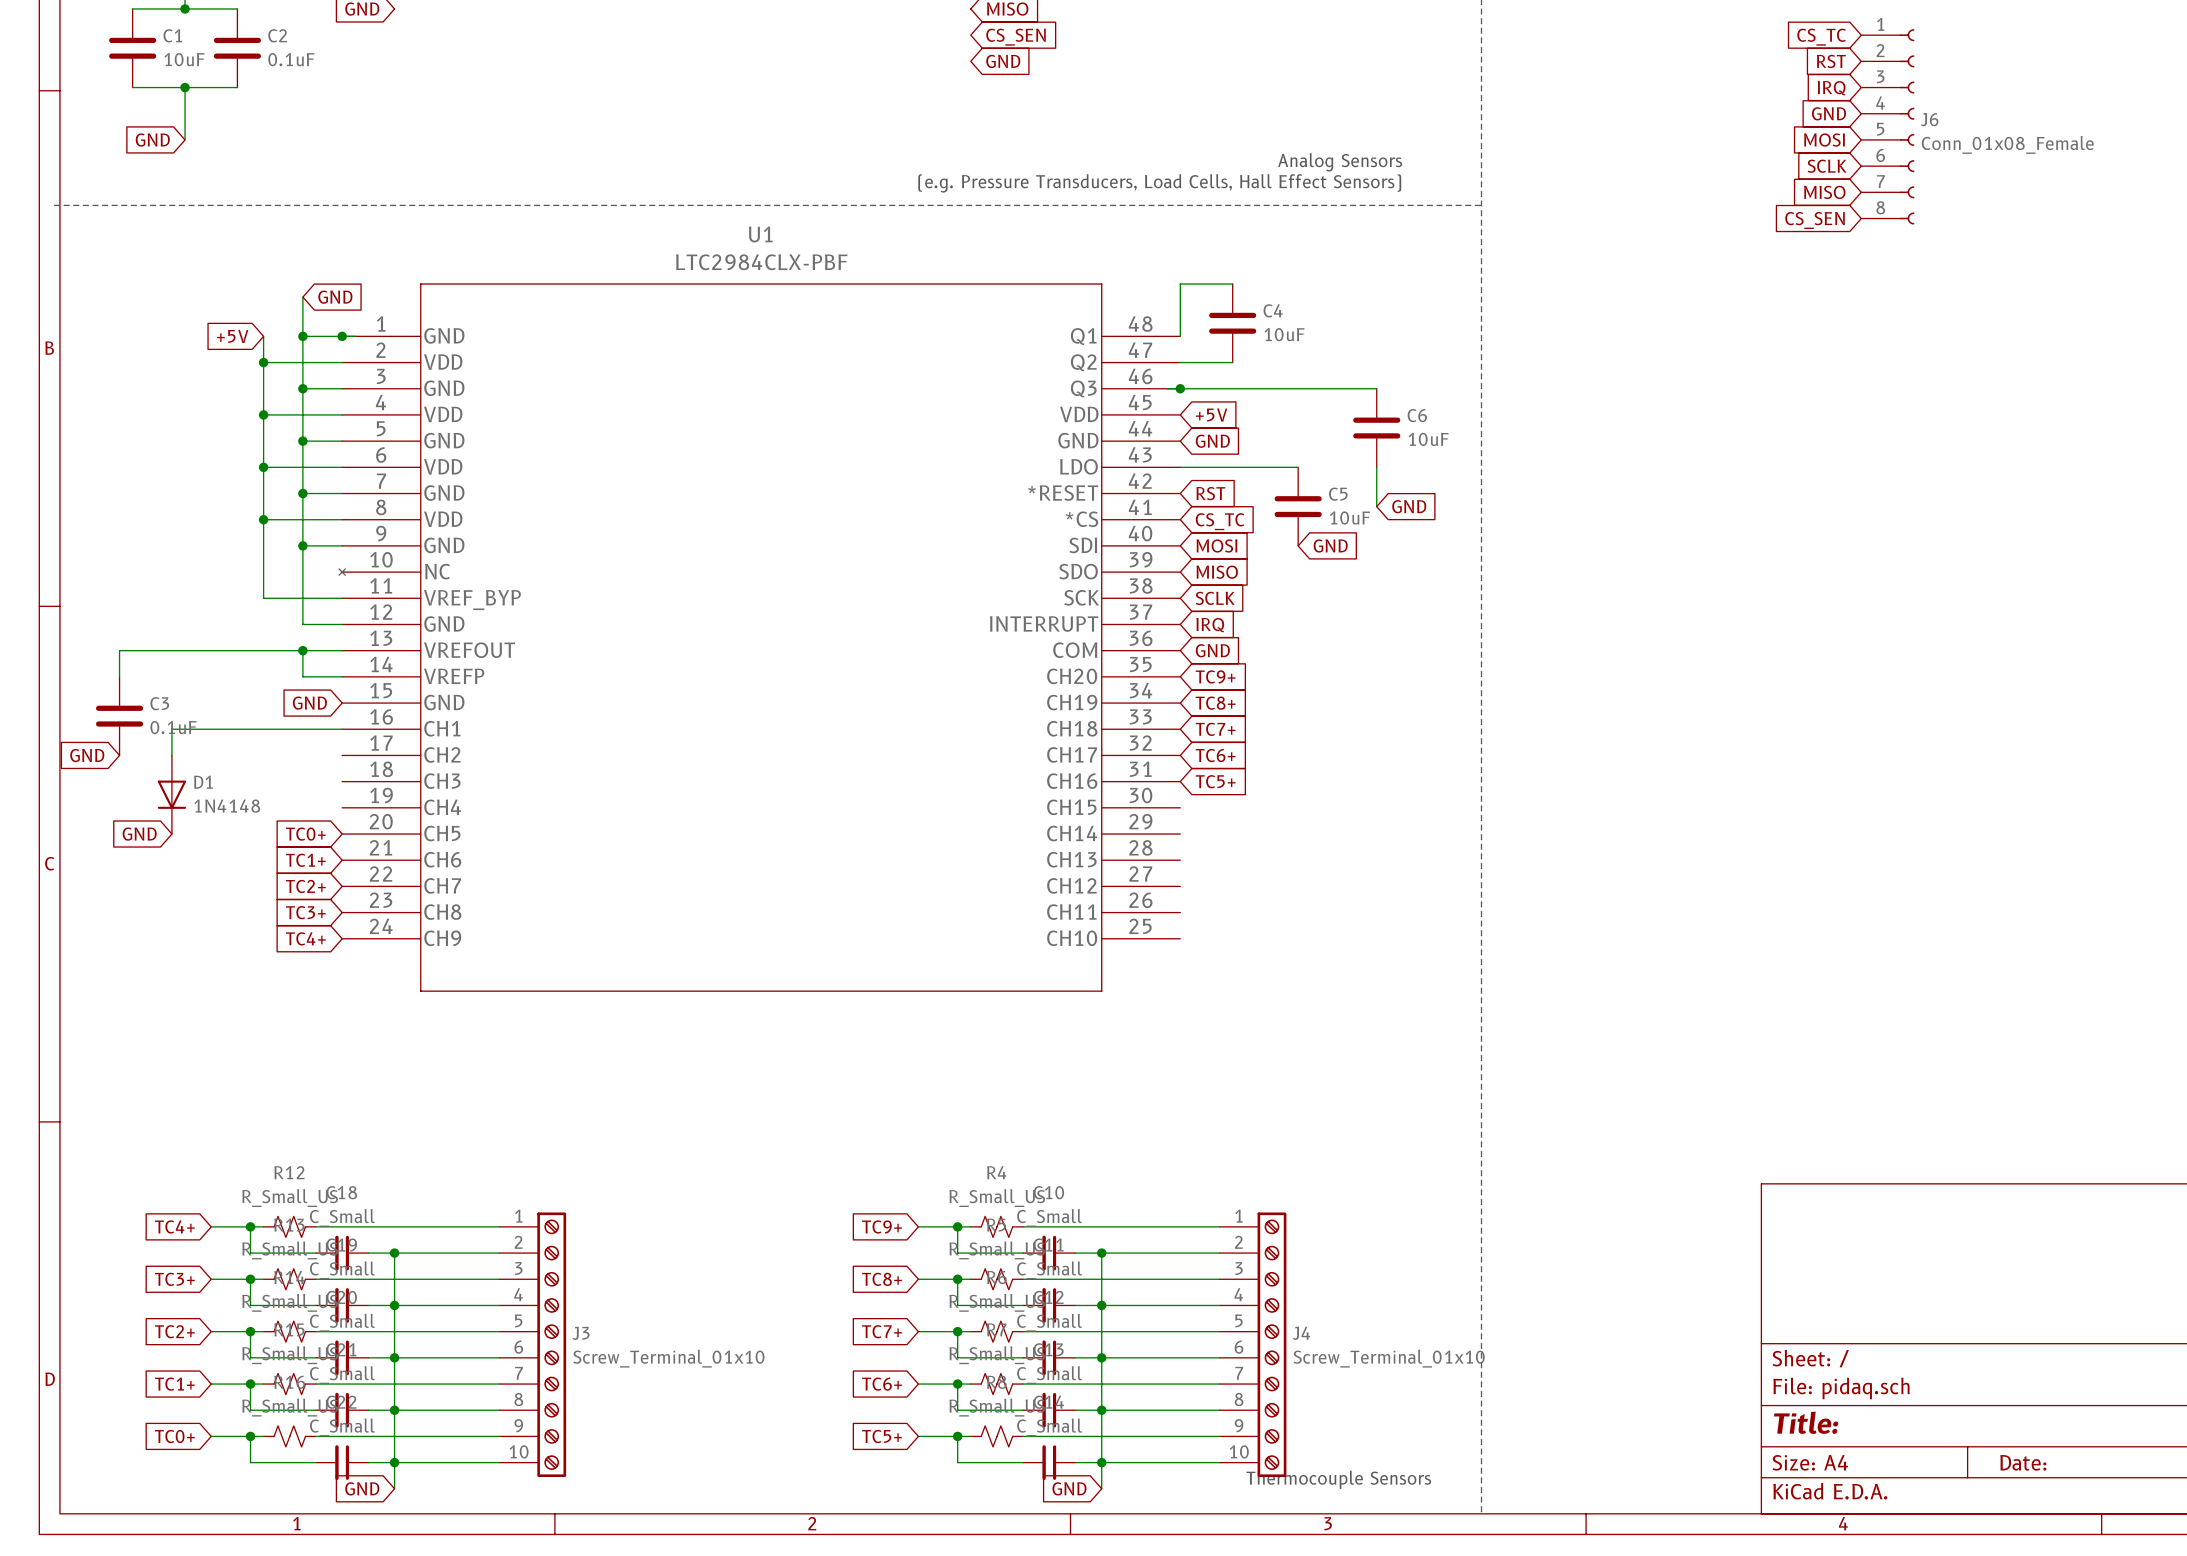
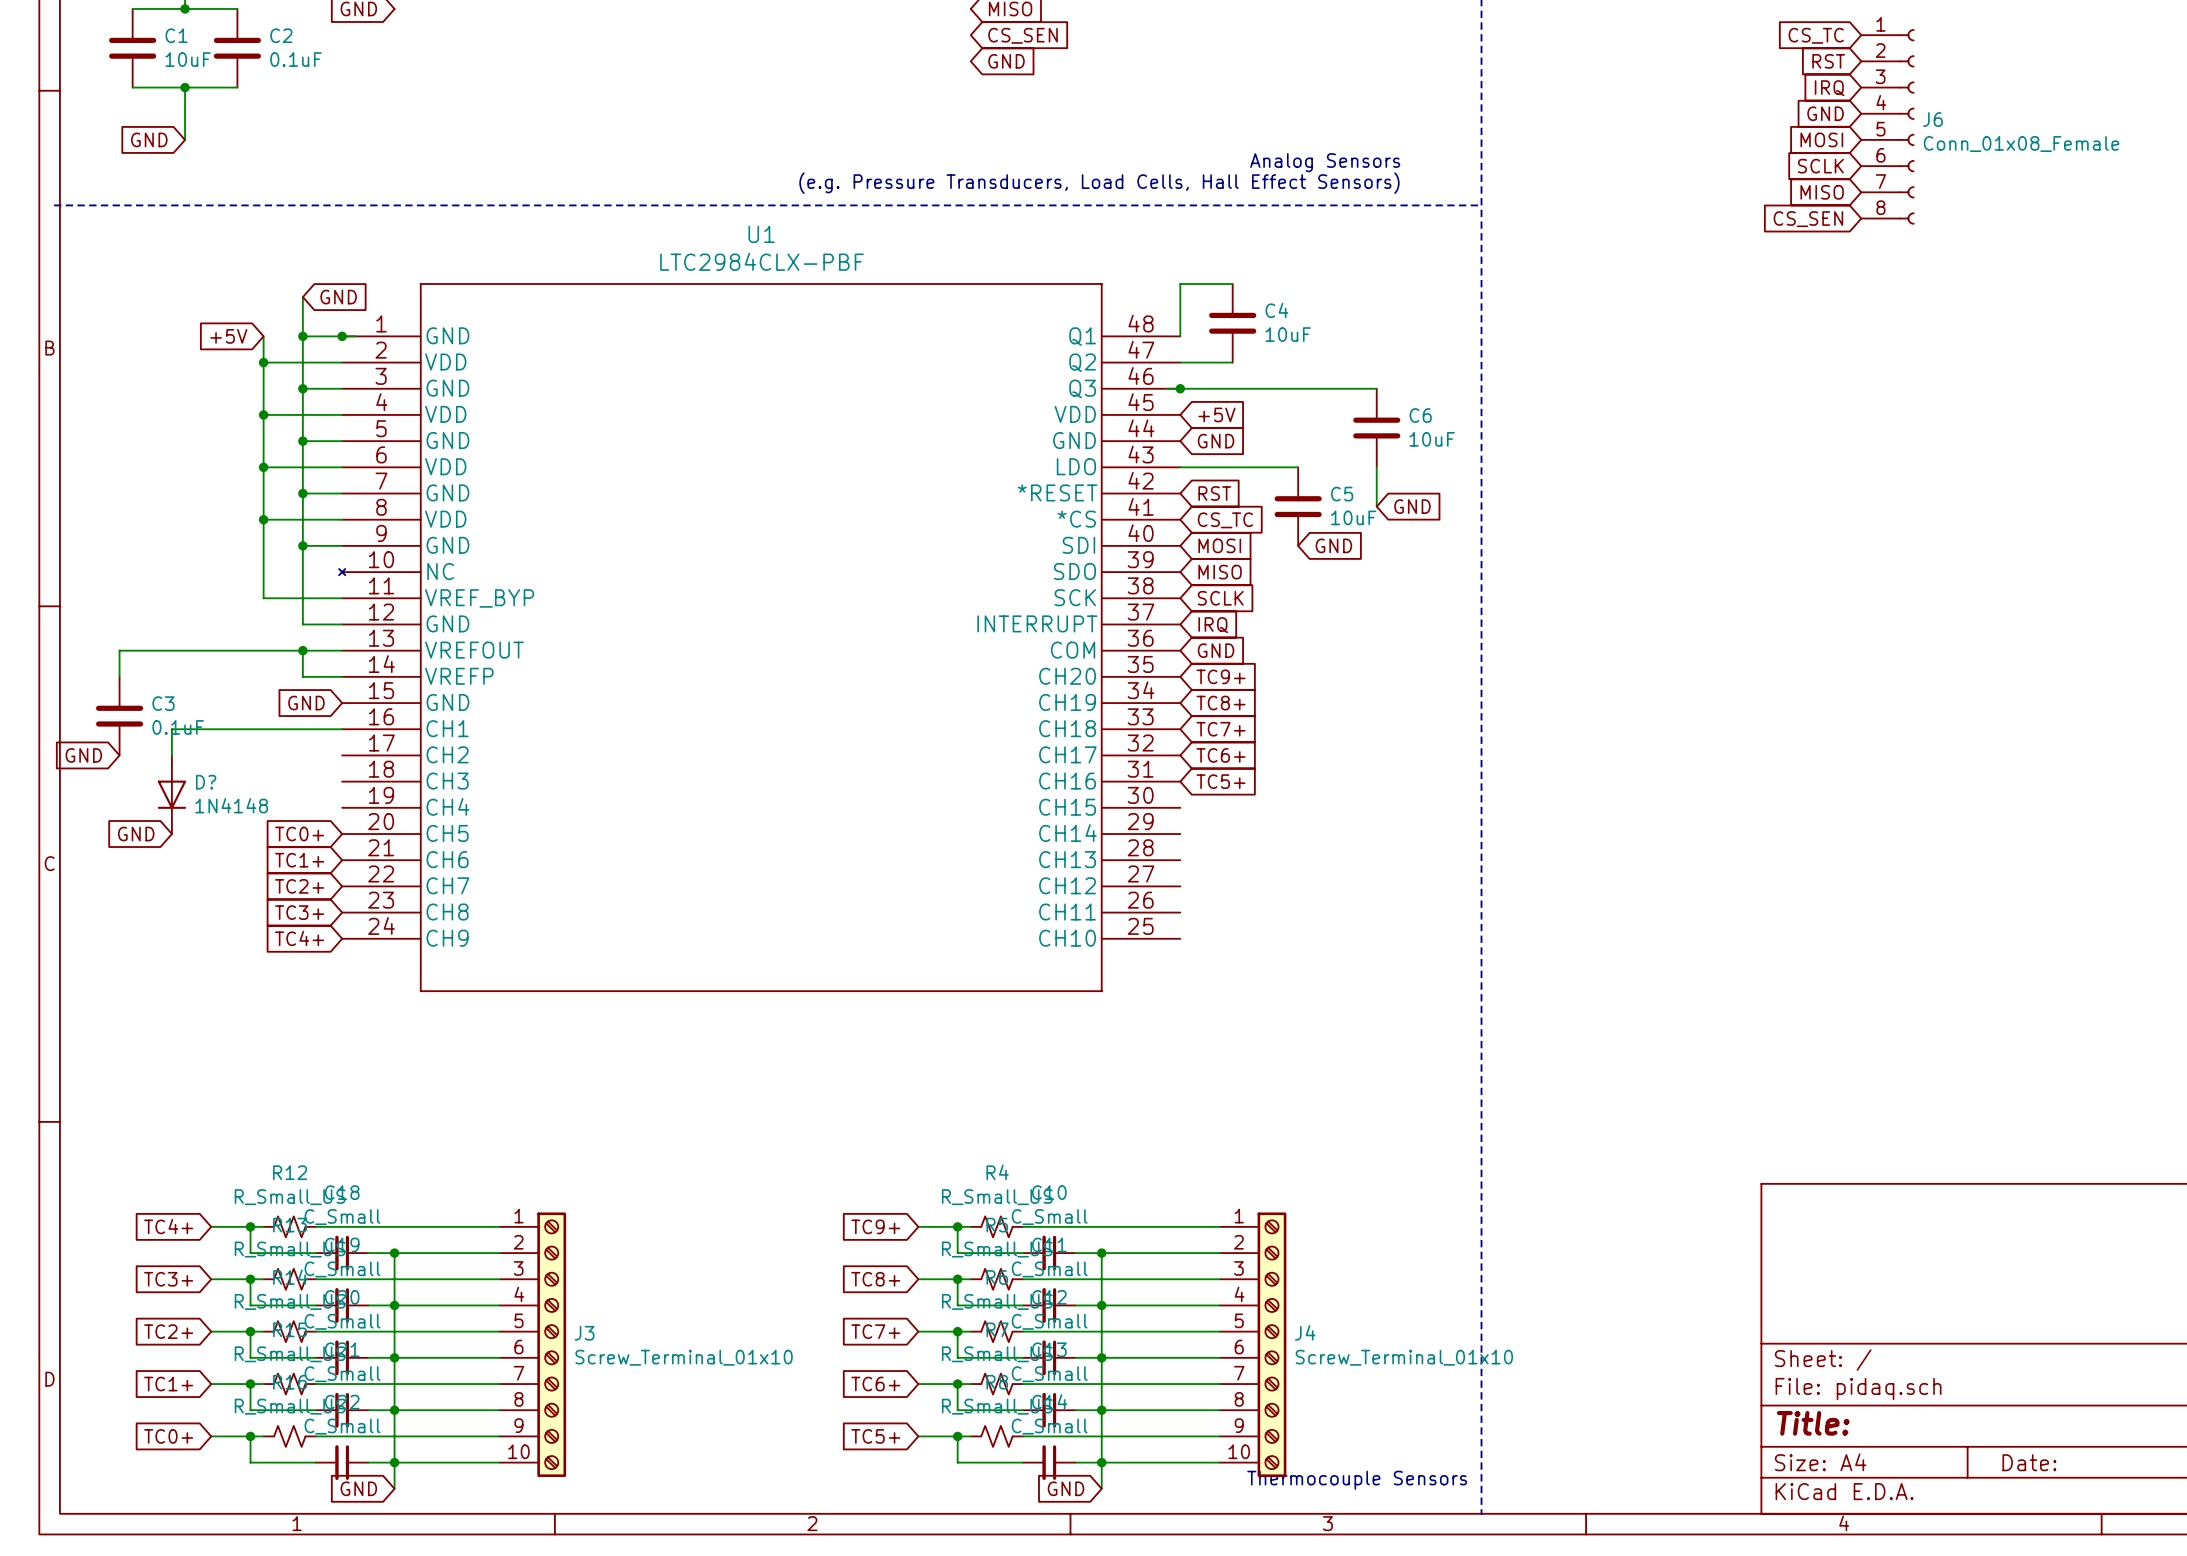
D1 name: D1 (203, 782) -> D? (206, 782)

